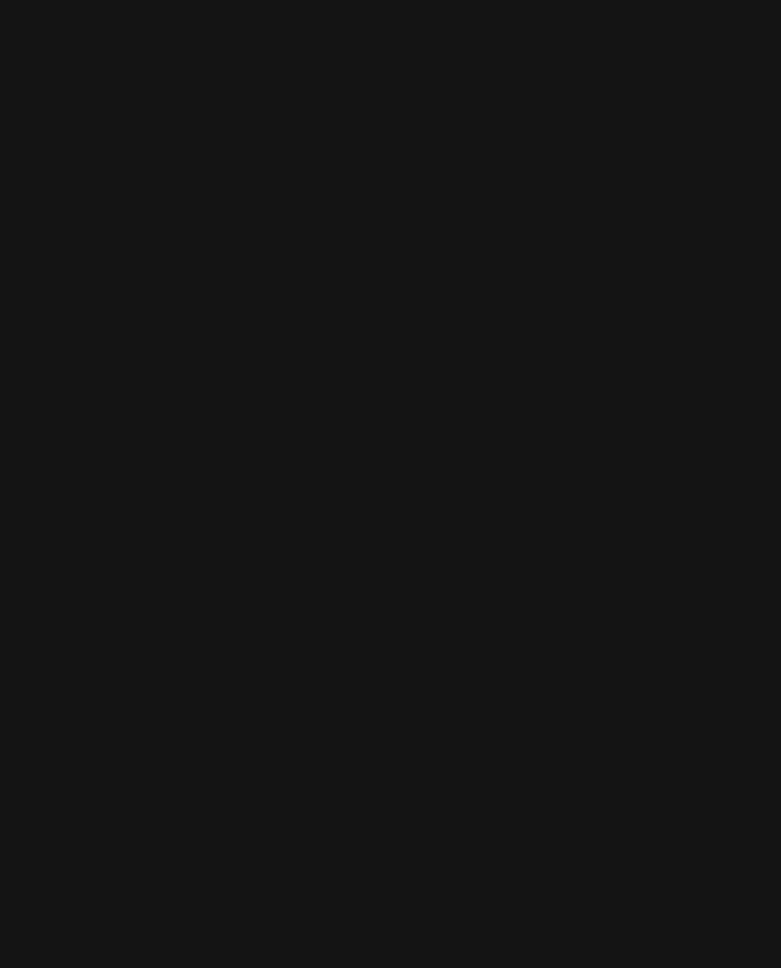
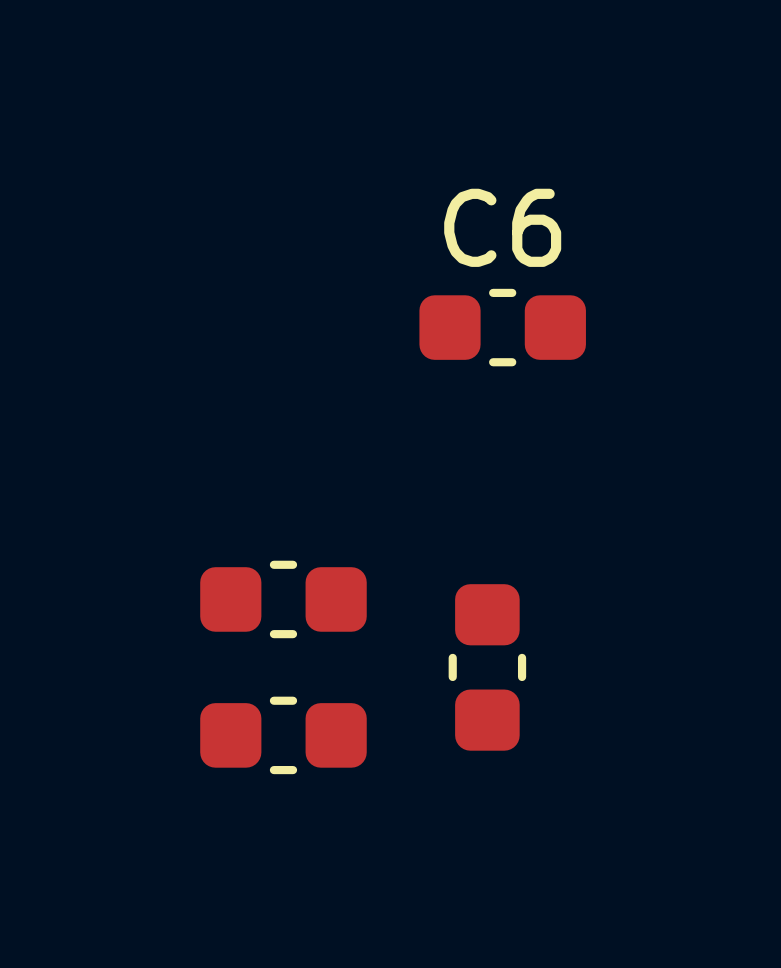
C6: none -> (502, 327)
part: none -> (283, 599)
part: none -> (487, 667)
part: none -> (283, 735)

